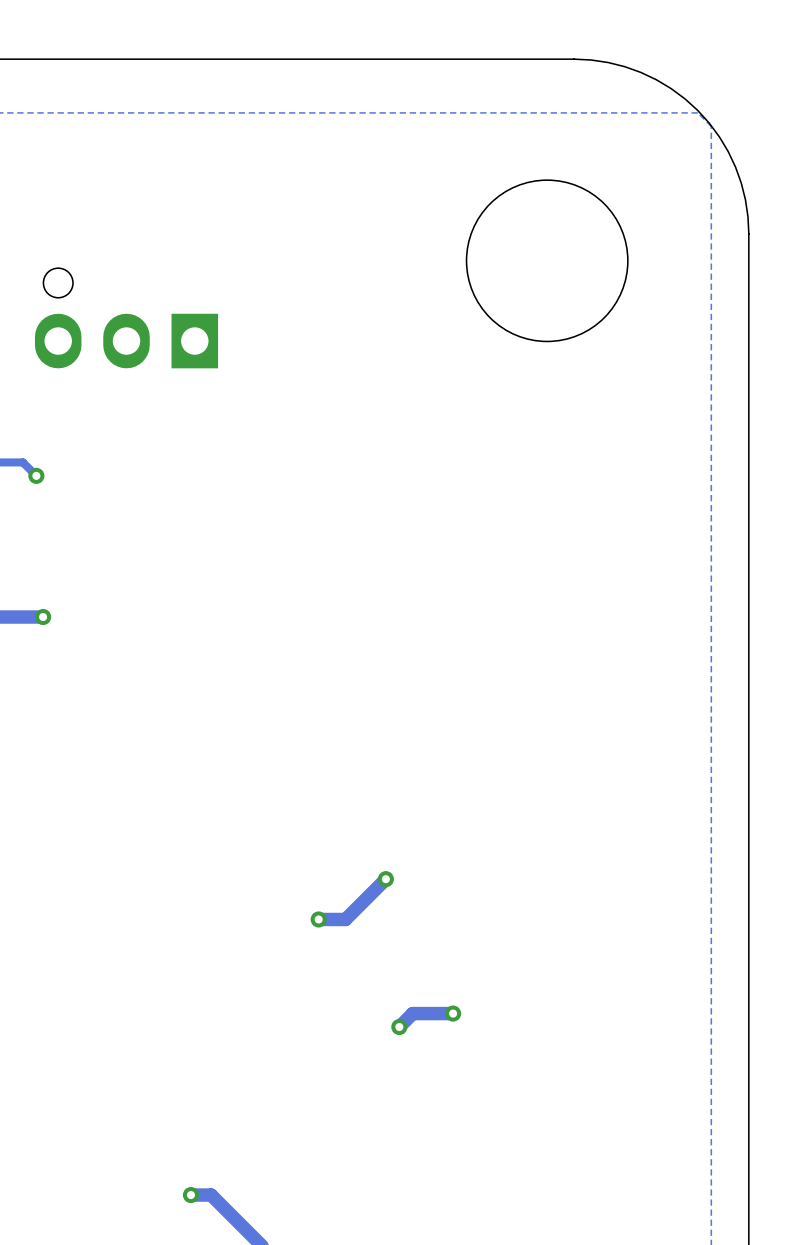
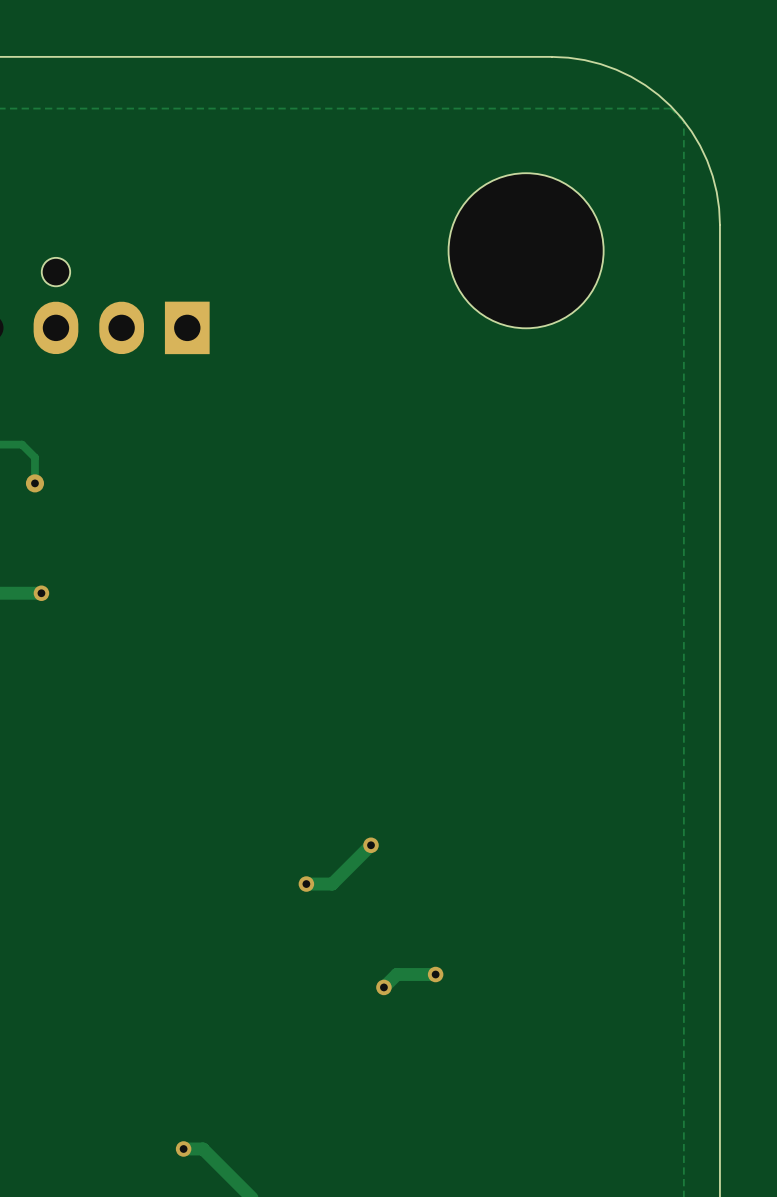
track: none -> (34, 457) (34, 483)
via: (36, 475) -> none
via: none -> (34, 483)

